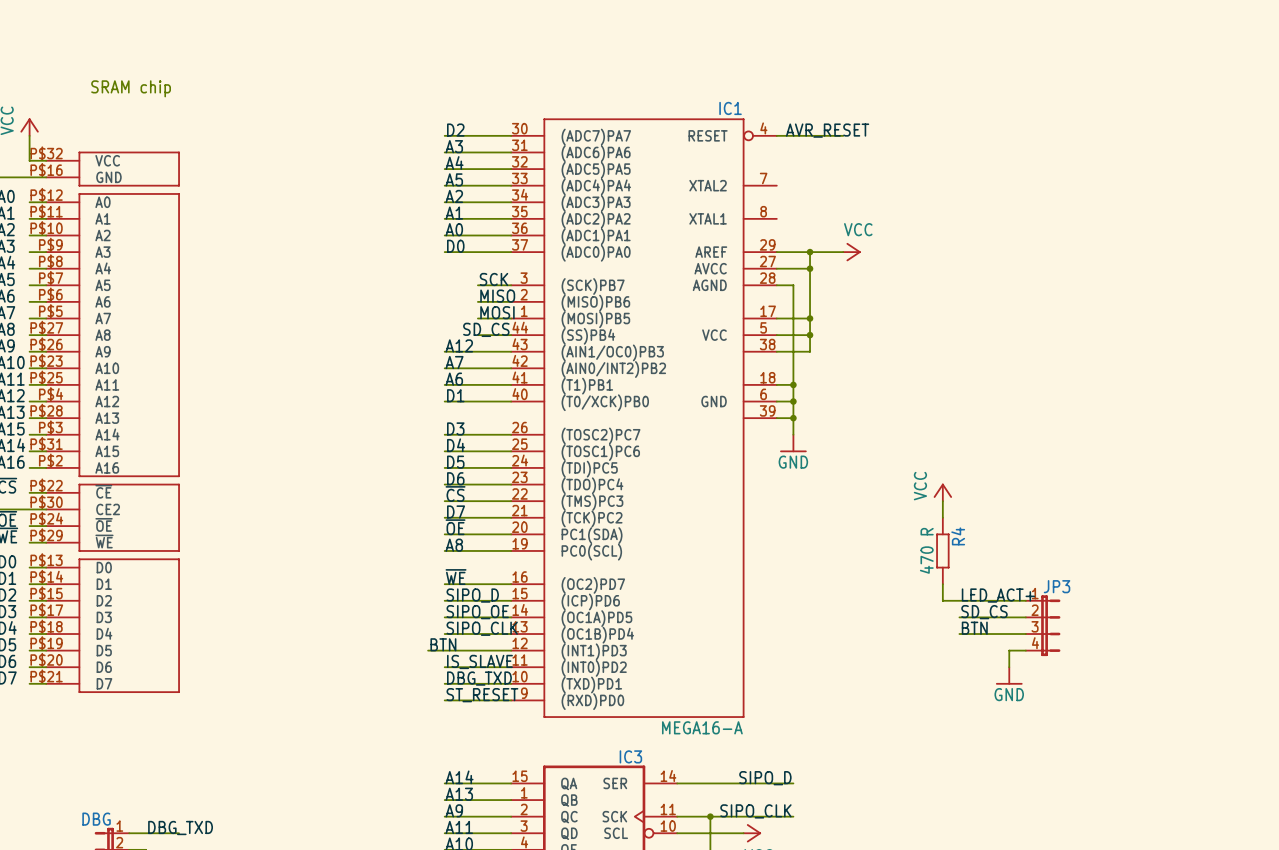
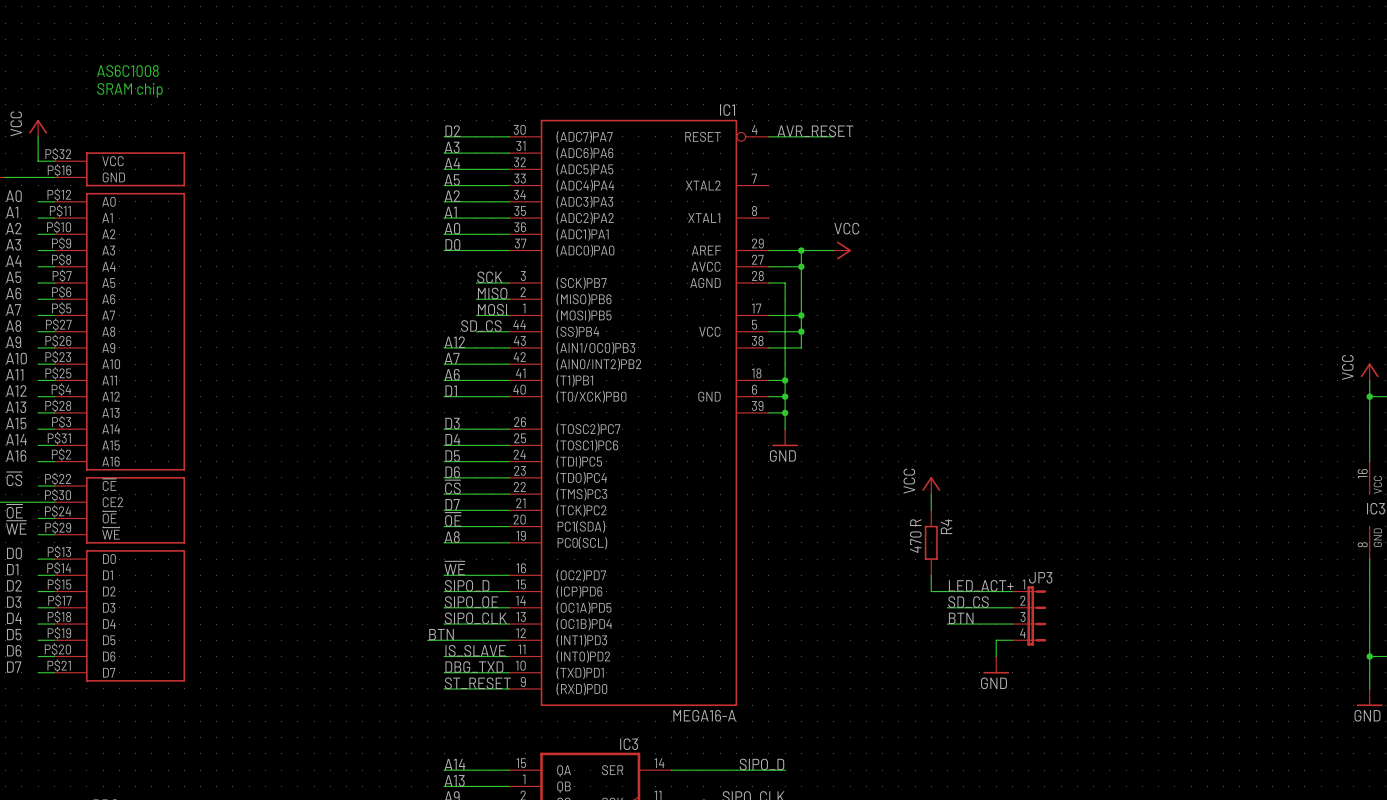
text: none -> AS6C1008 (127, 71)

